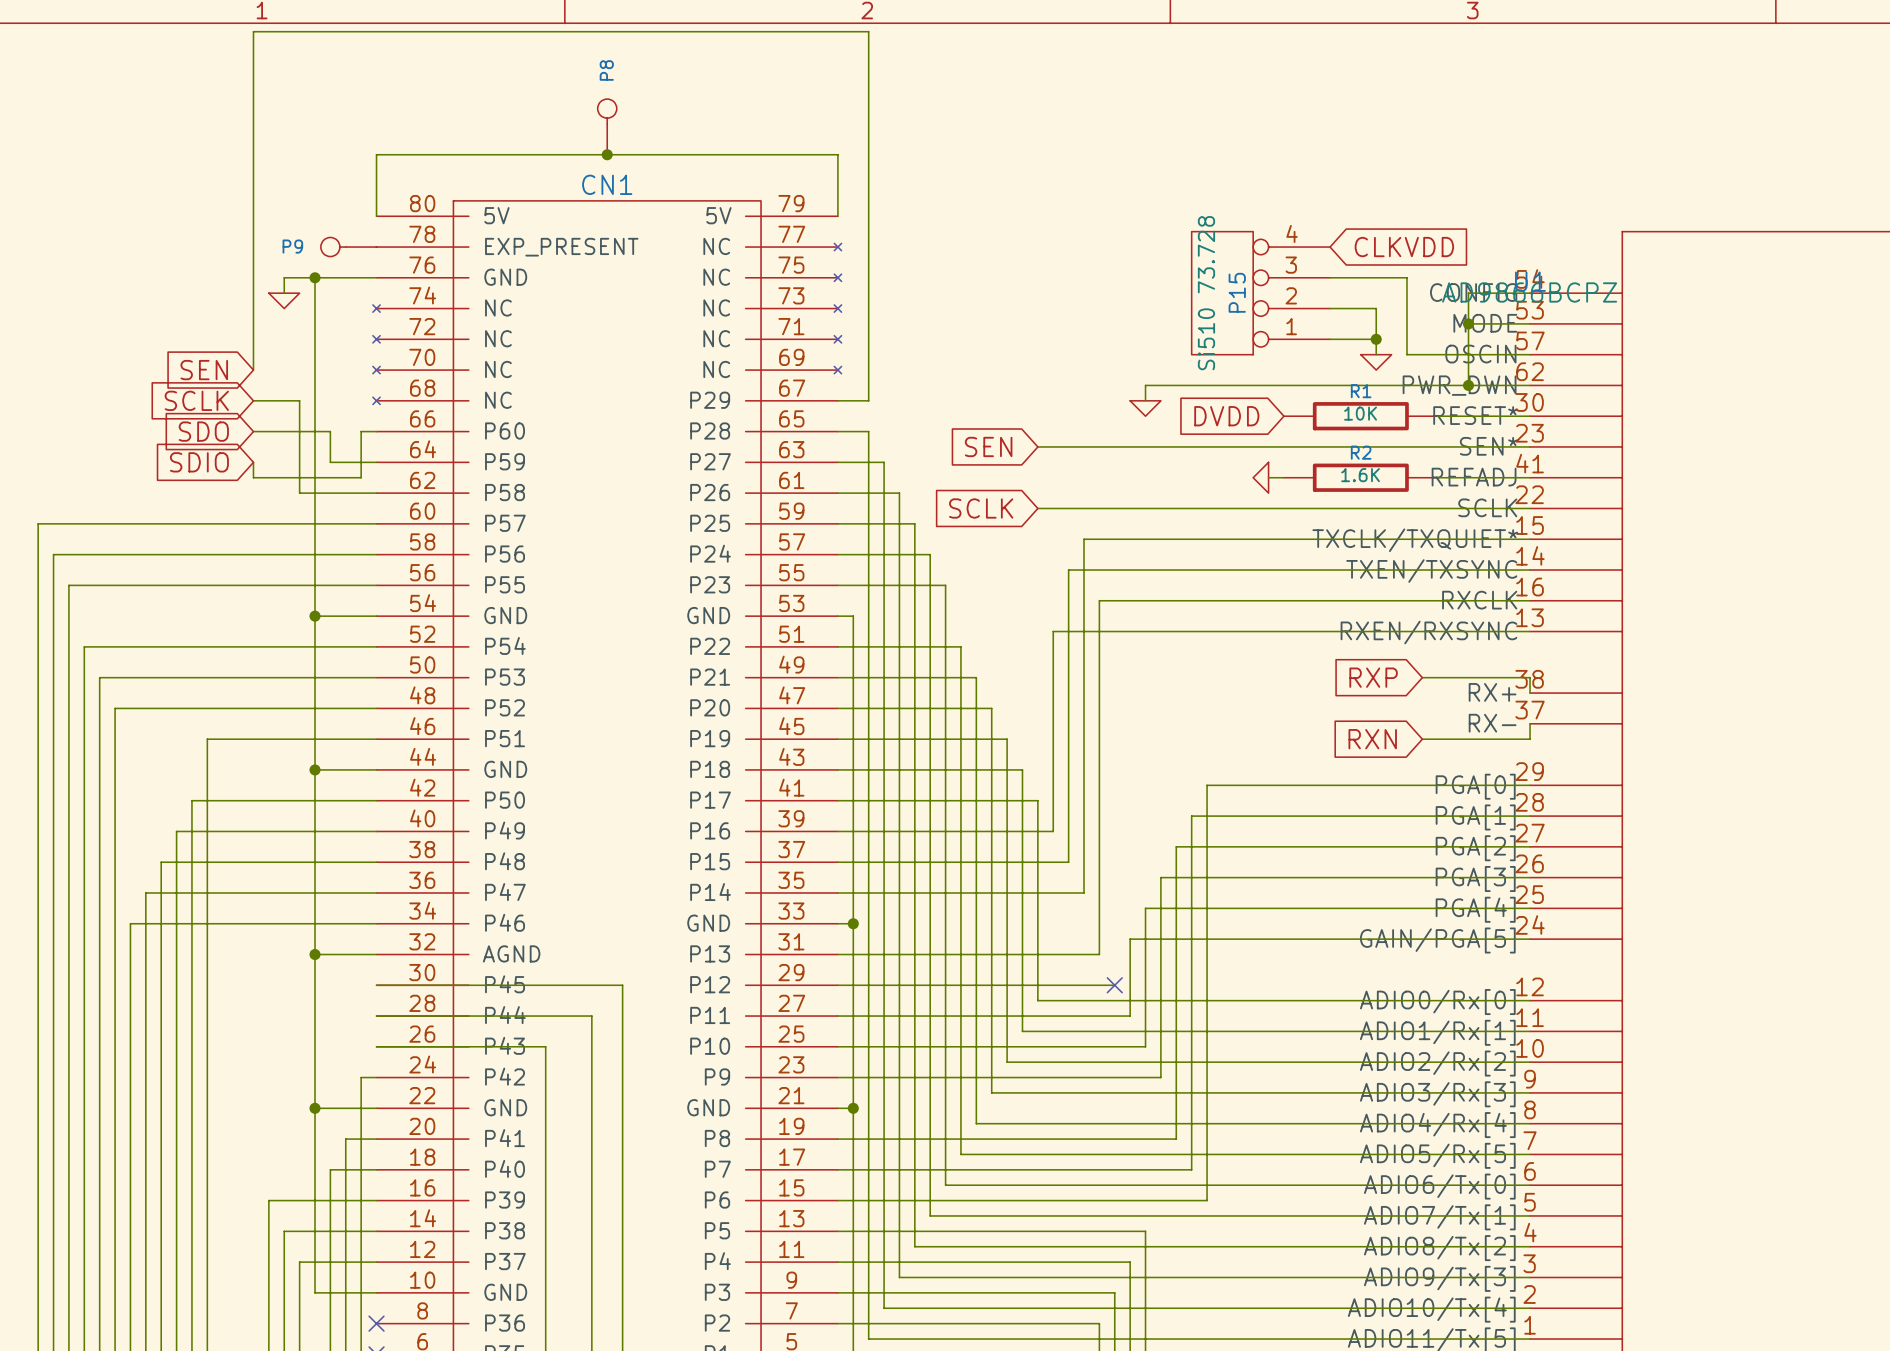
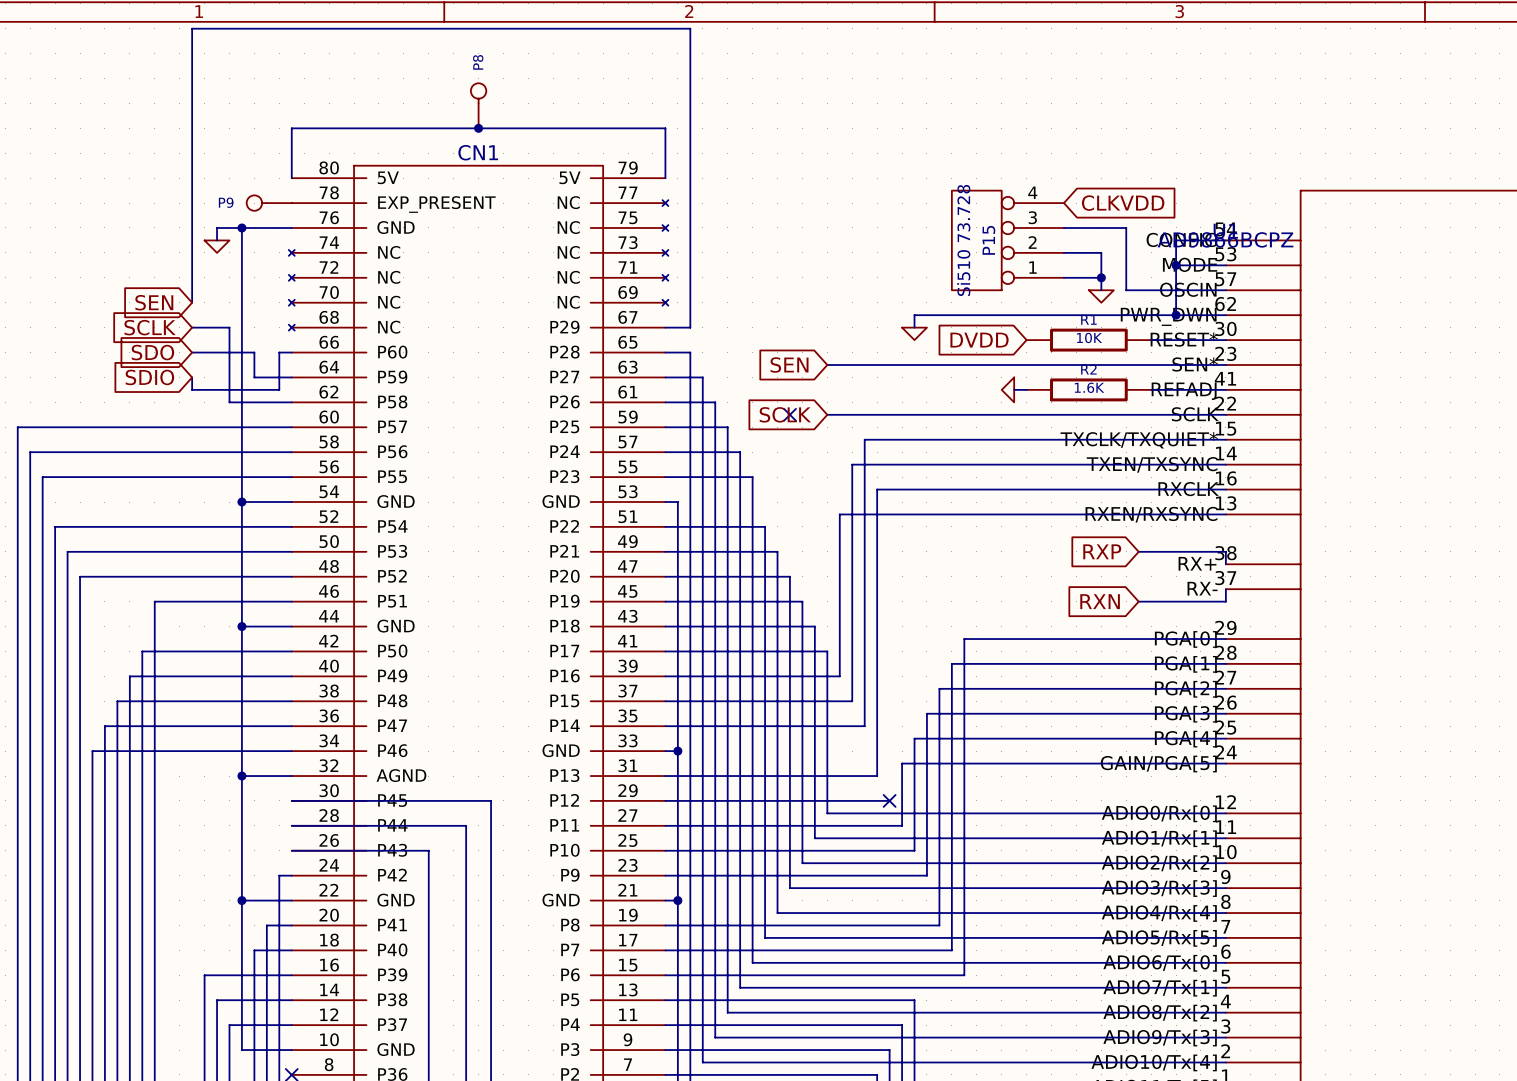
no-connect mark: none -> (789, 414)

